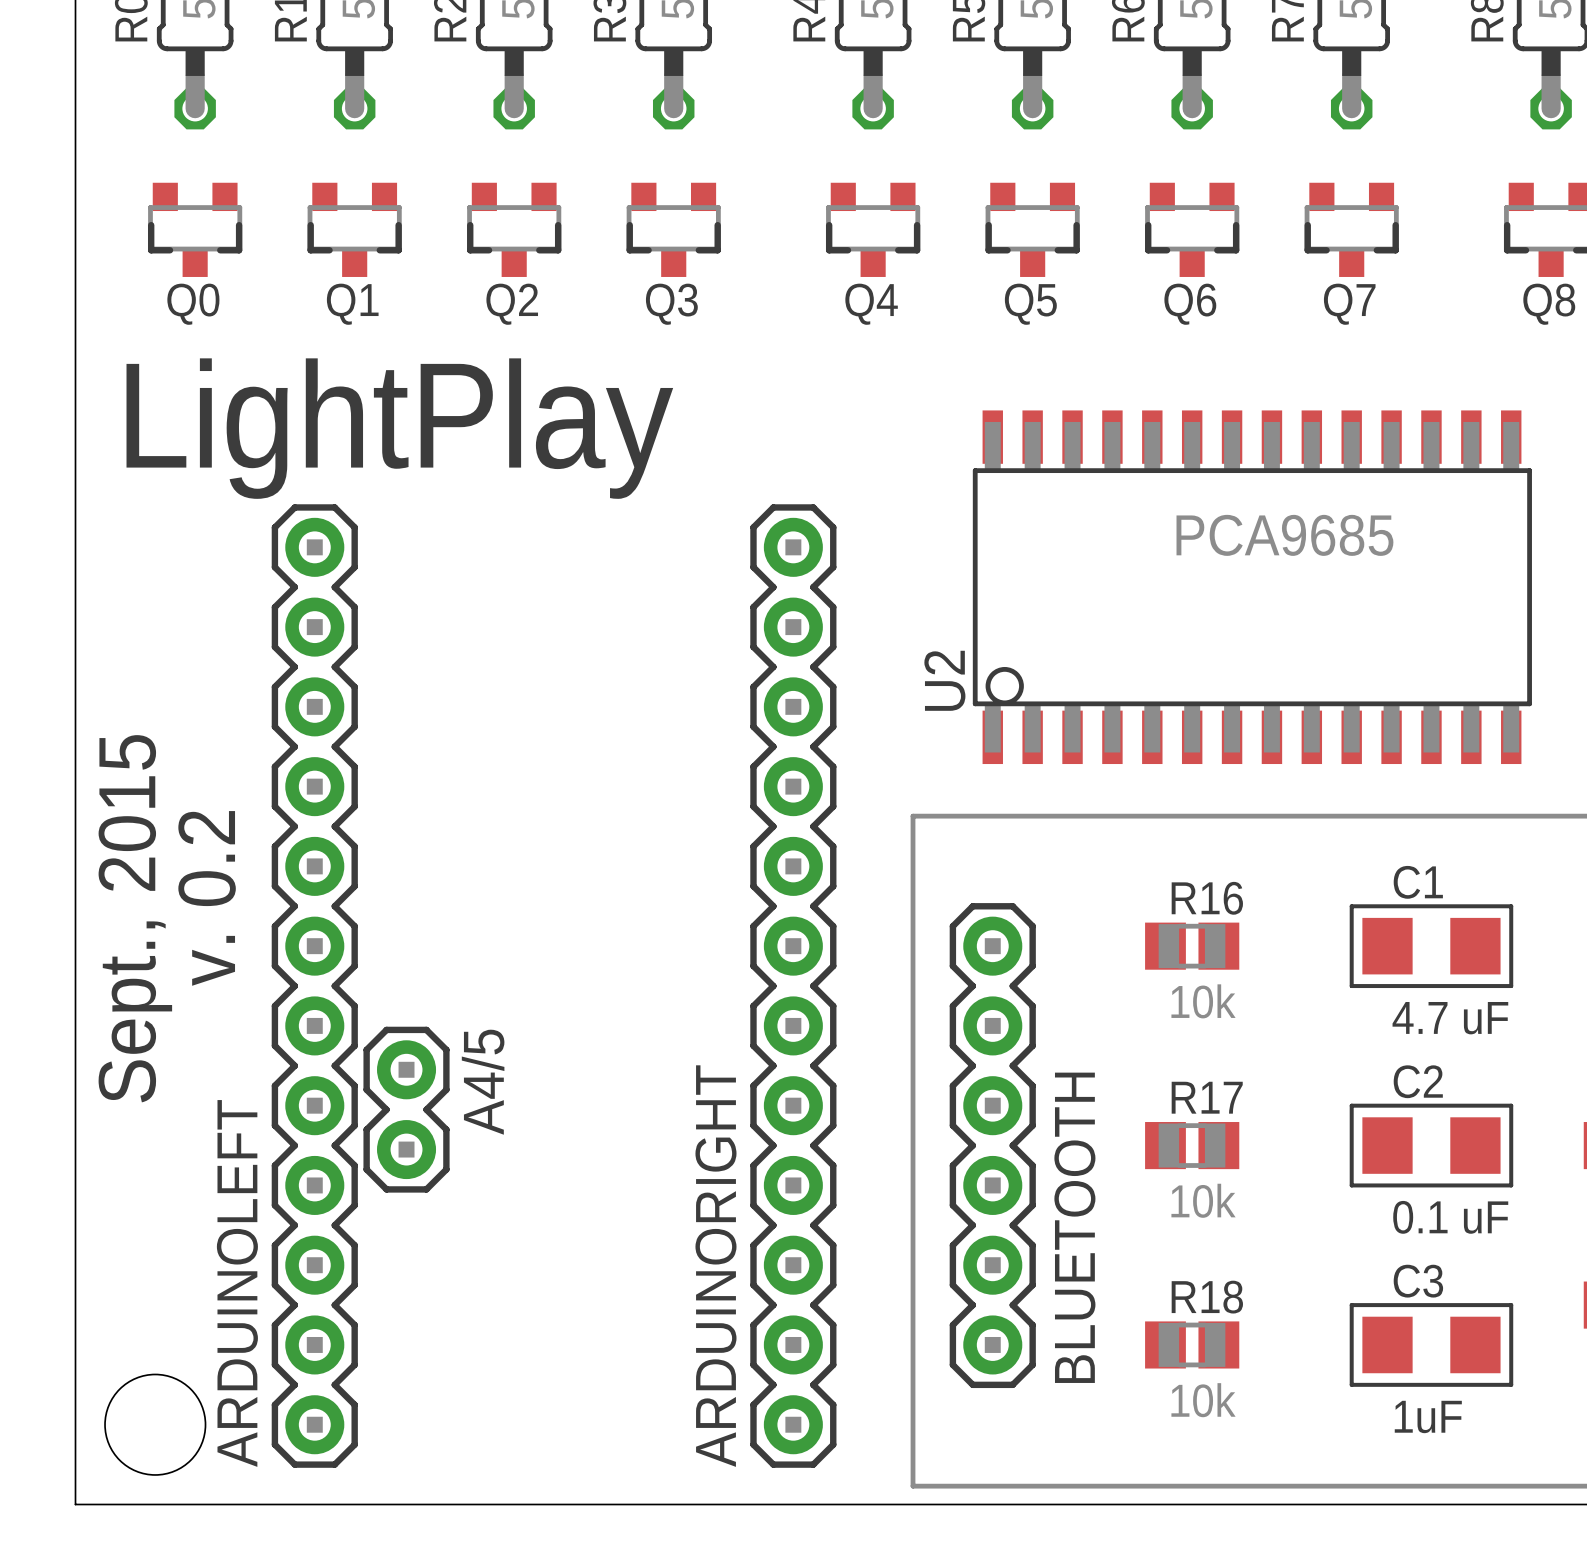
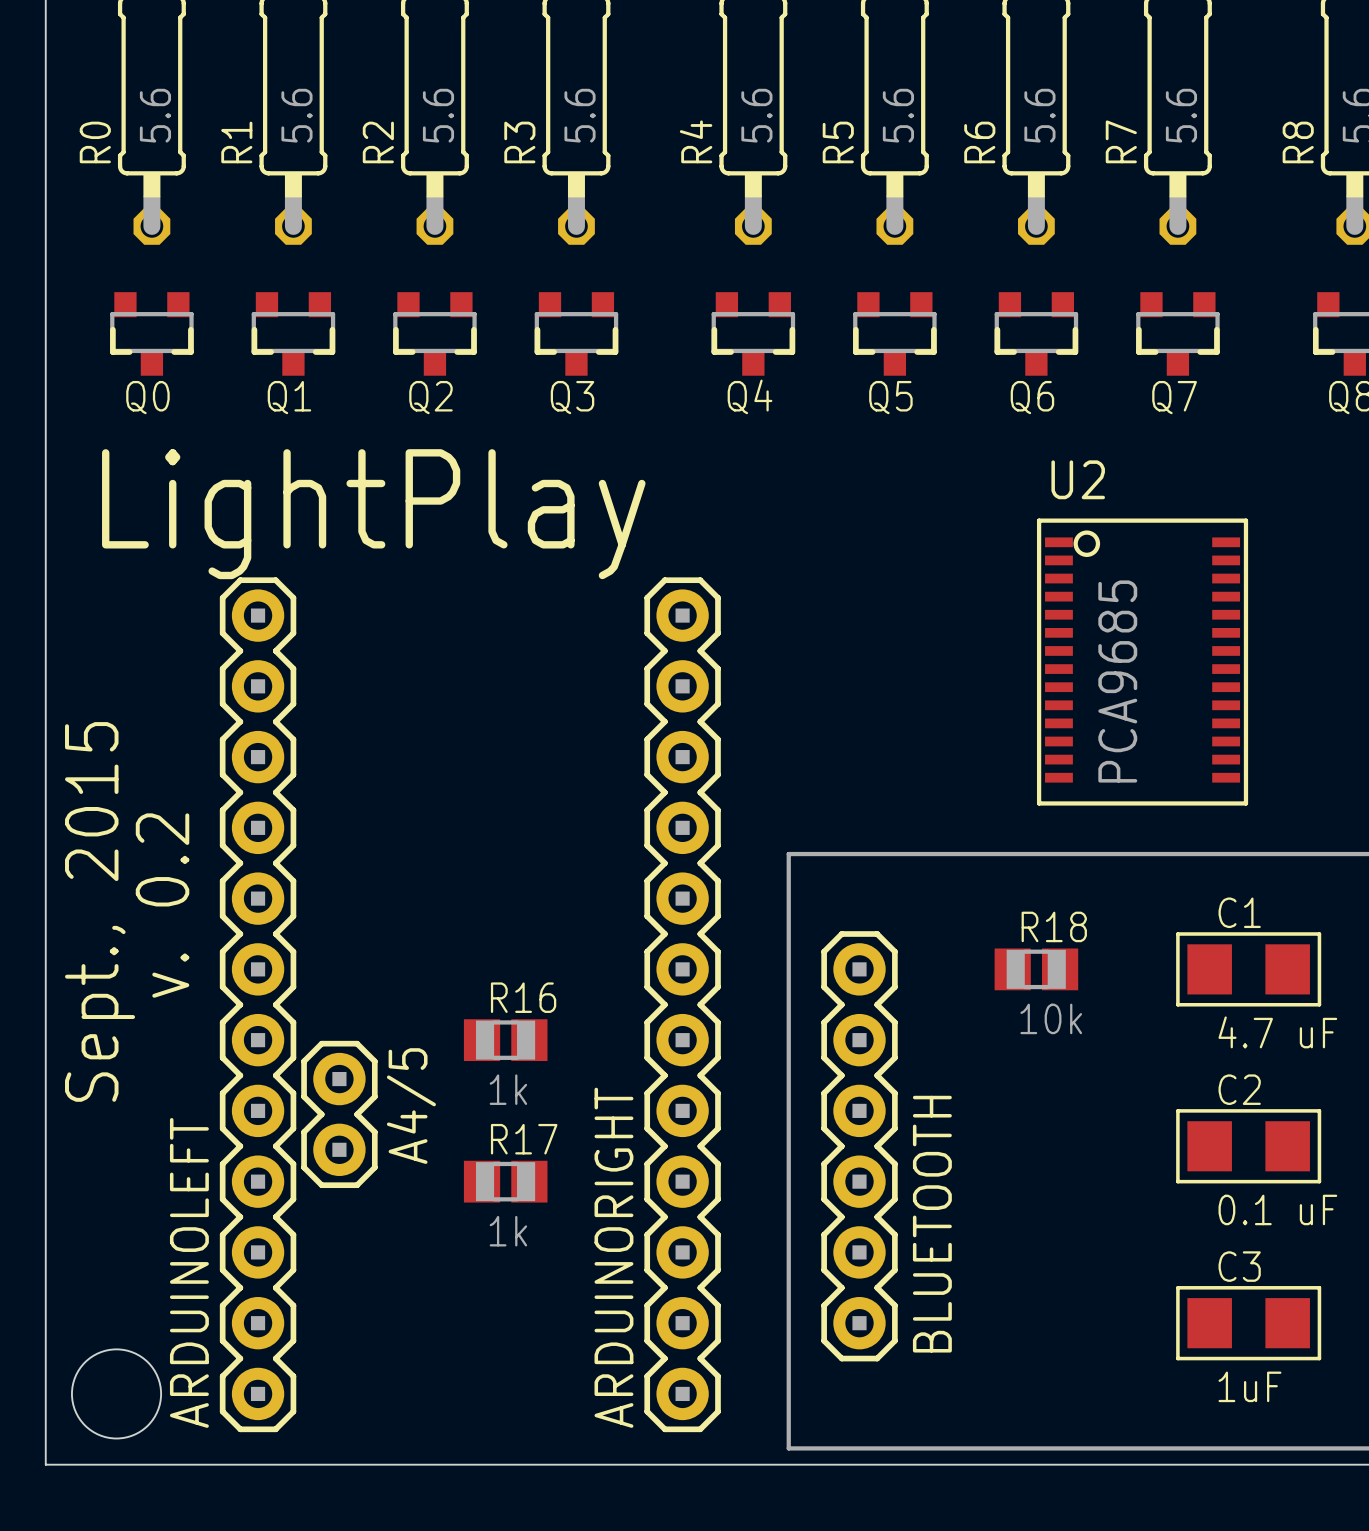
U2 footprint: [972, 410, 1532, 765] -> [1036, 518, 1249, 806]
U2 value position: PCA9685 (1284, 535) -> PCA9685 (1117, 681)
U2 name position: U2 (944, 680) -> U2 (1078, 479)
R16 name: R16 (1207, 898) -> R18 (1054, 926)
R16: none -> 1k (505, 1040)
R17 position: (1192, 1145) -> (505, 1181)
R17 value: 10k (1203, 1200) -> 1k (508, 1231)
R18: 10k (1192, 1344) -> none

